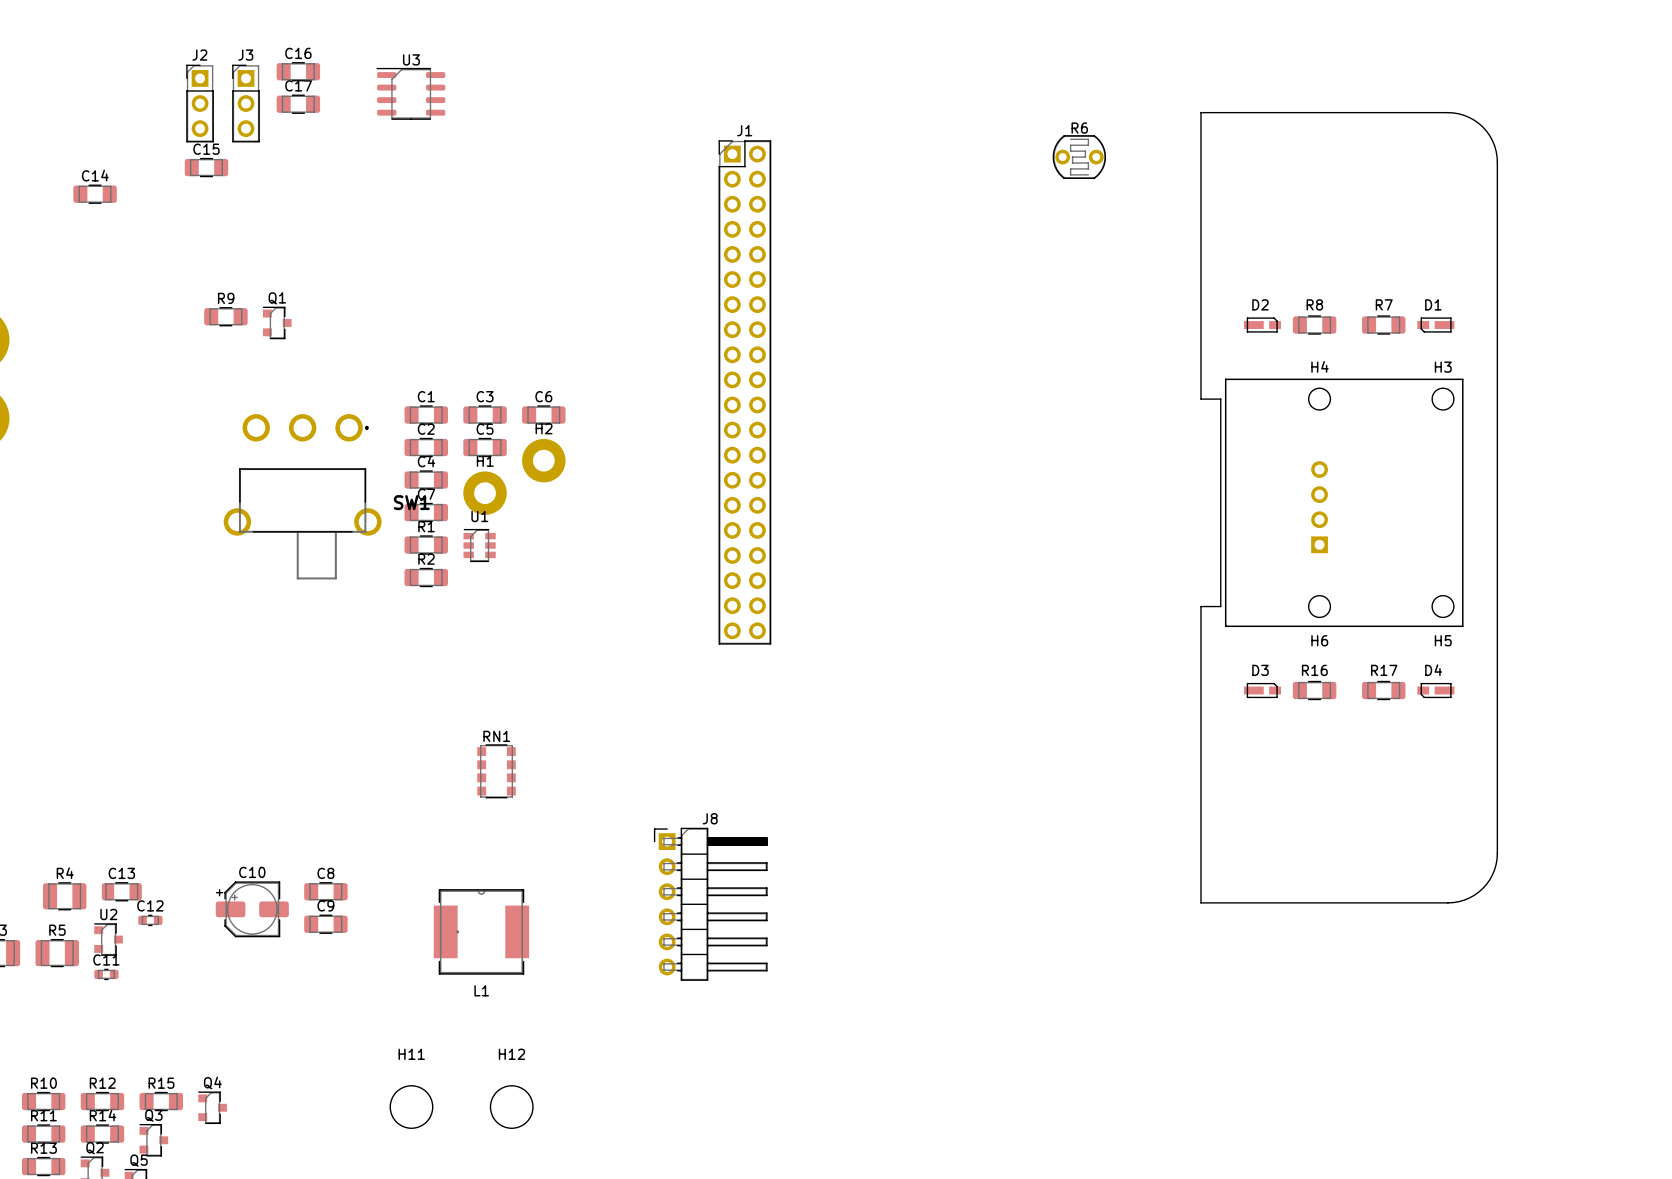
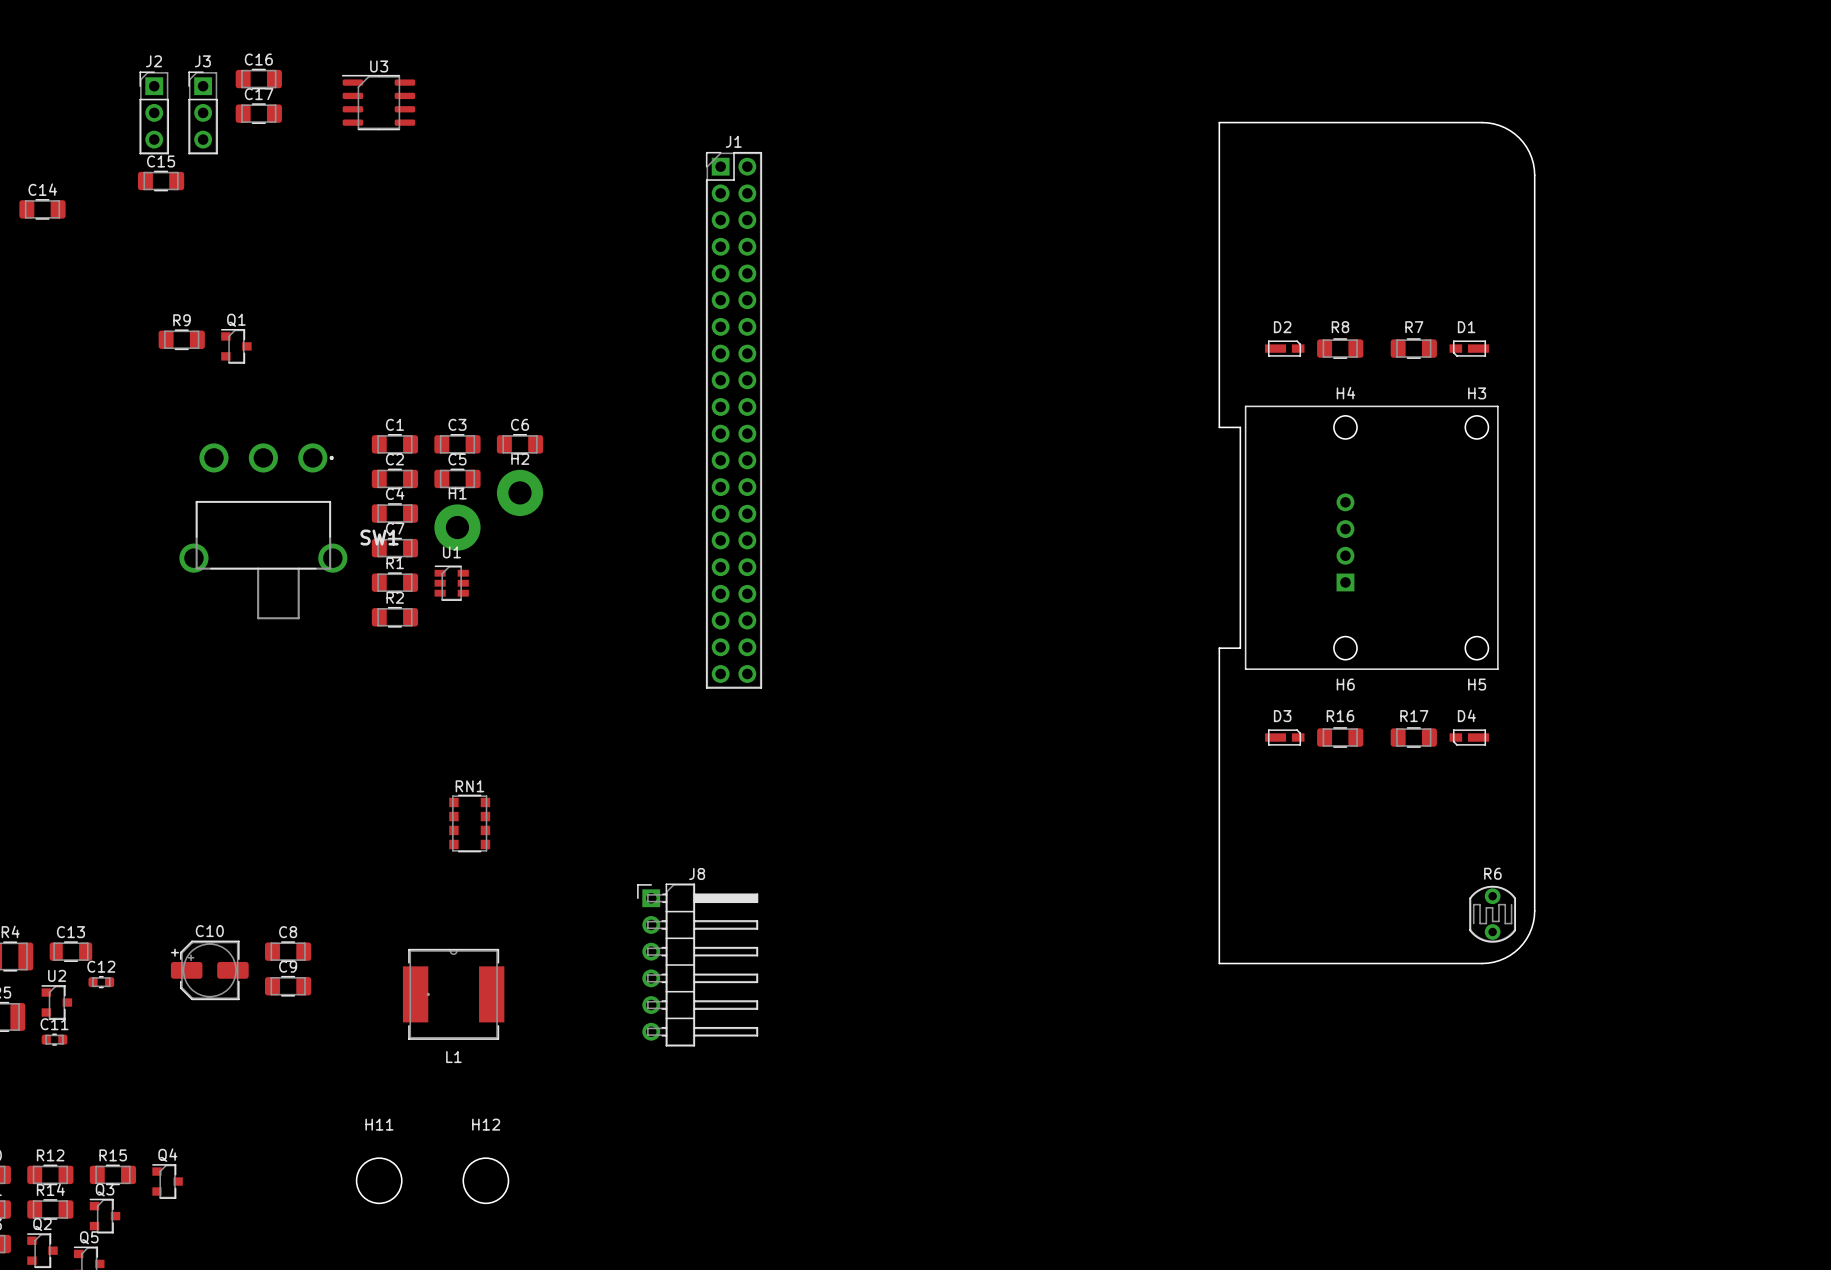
R6 rotation: 0° (1079, 157) -> 90° counterclockwise (1492, 914)
R6 position: (1079, 157) -> (1492, 914)

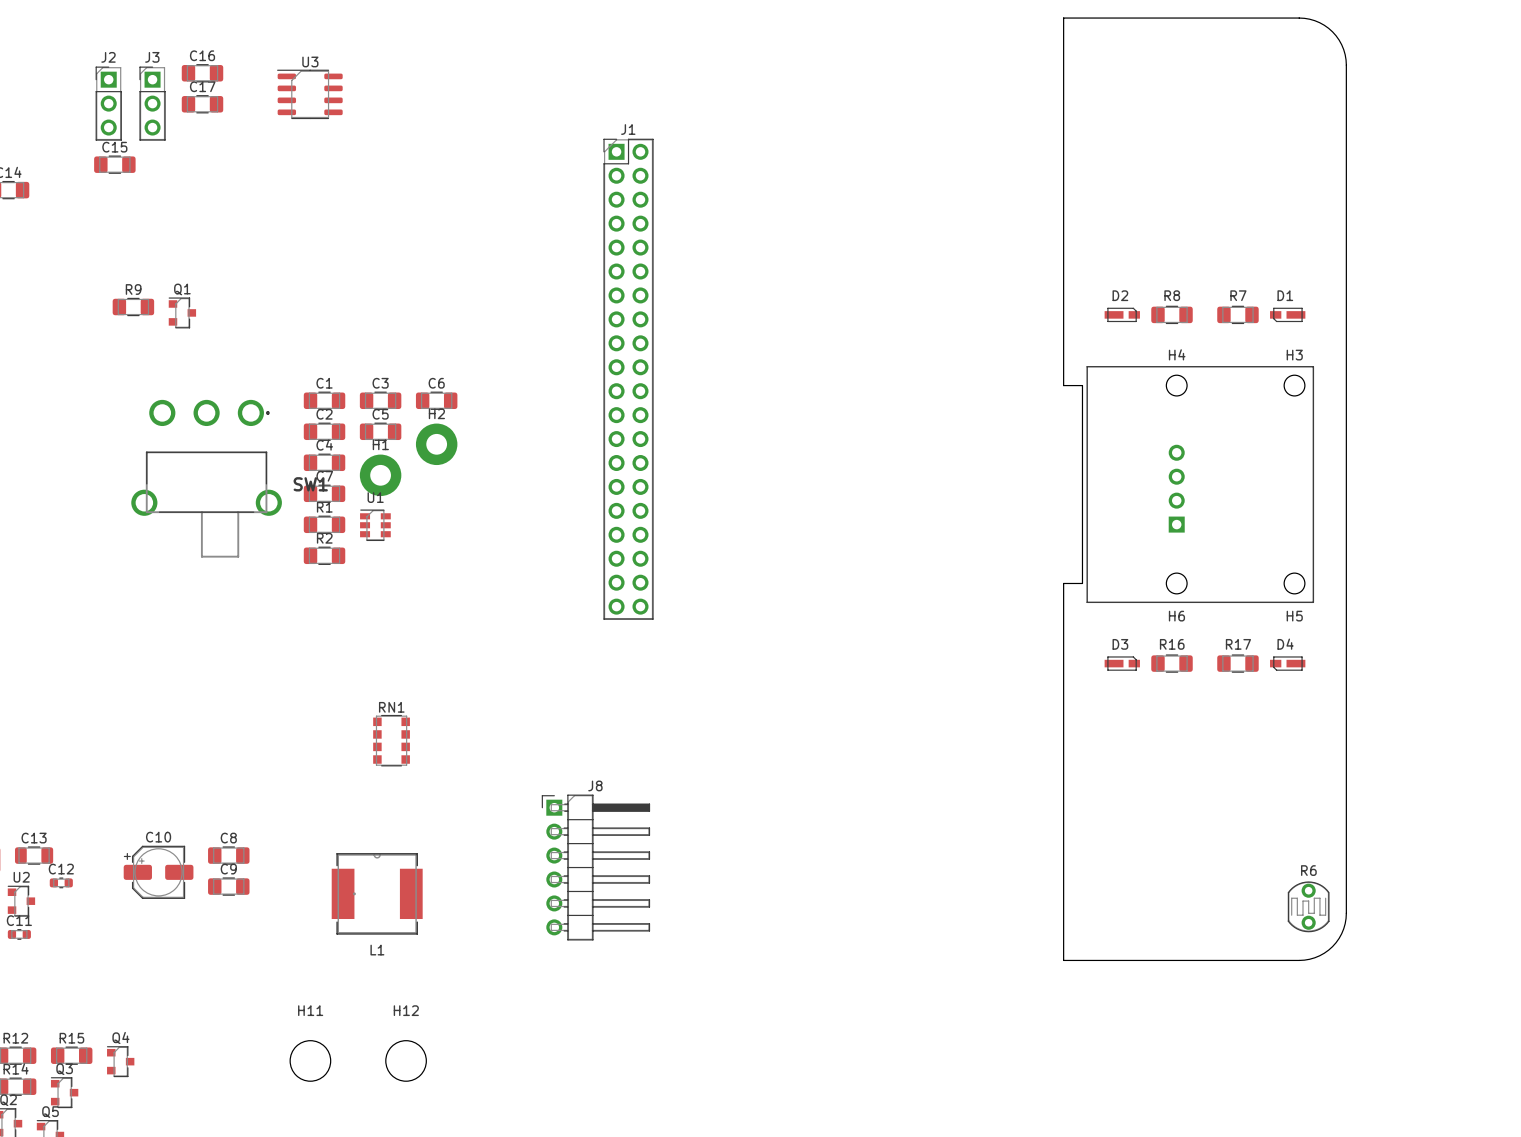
board edge: (1219, 122) (1488, 122) (1504, 127) (1519, 137) (1531, 157) (1534, 175) -> (1063, 112) (1063, 18) (1304, 18) (1314, 20) (1328, 28) (1339, 40) (1343, 49) (1346, 65) (1346, 159)
board edge: (1534, 910) (1531, 928) (1519, 948) (1504, 958) (1488, 963) (1219, 963) -> (1346, 819) (1346, 913) (1343, 928) (1336, 942) (1328, 950) (1314, 957) (1304, 960) (1063, 960) (1063, 866)
R6 position: (1492, 914) -> (1308, 906)

